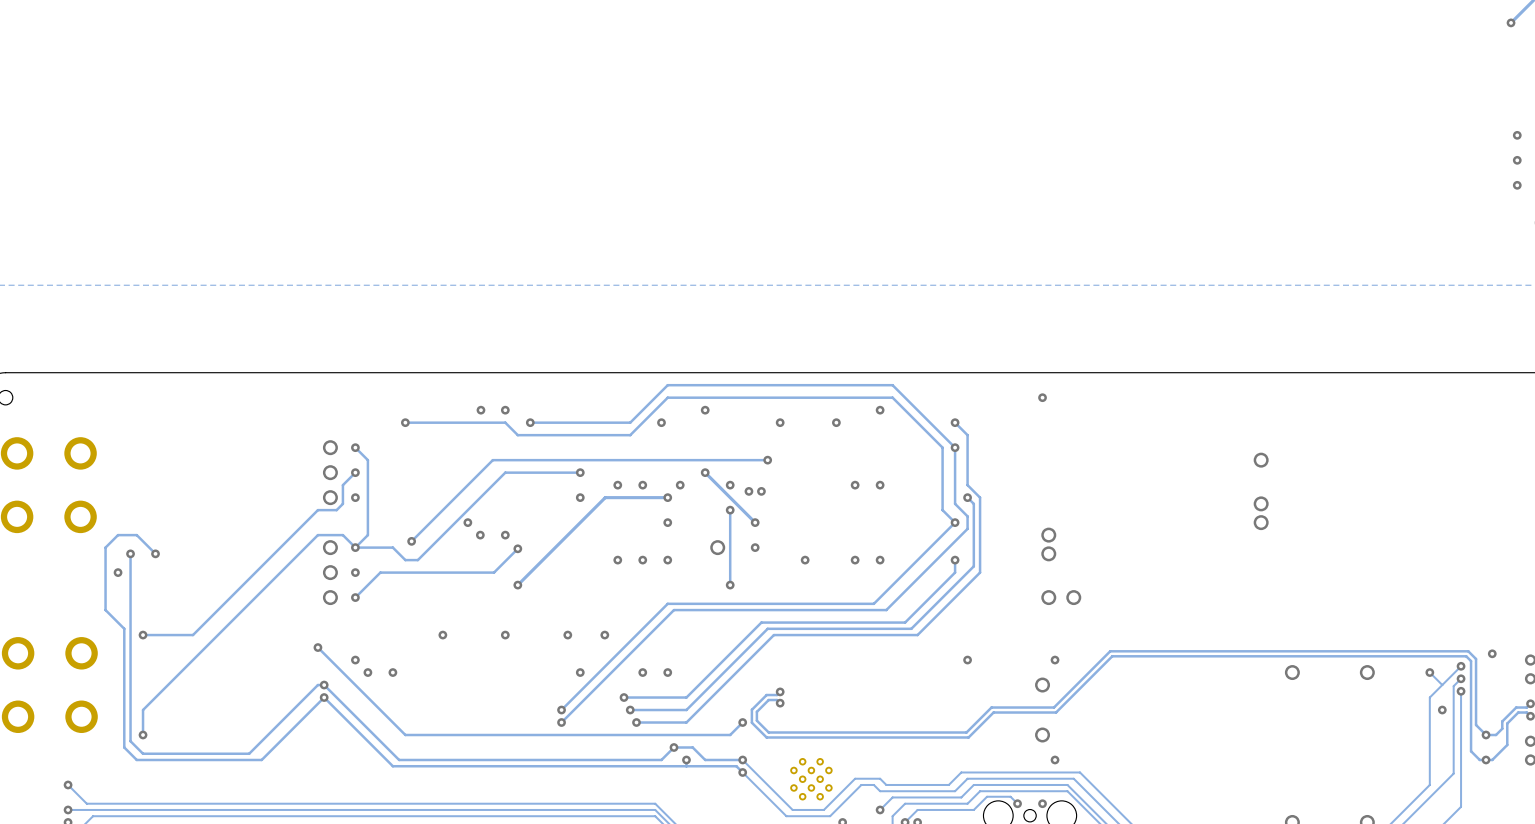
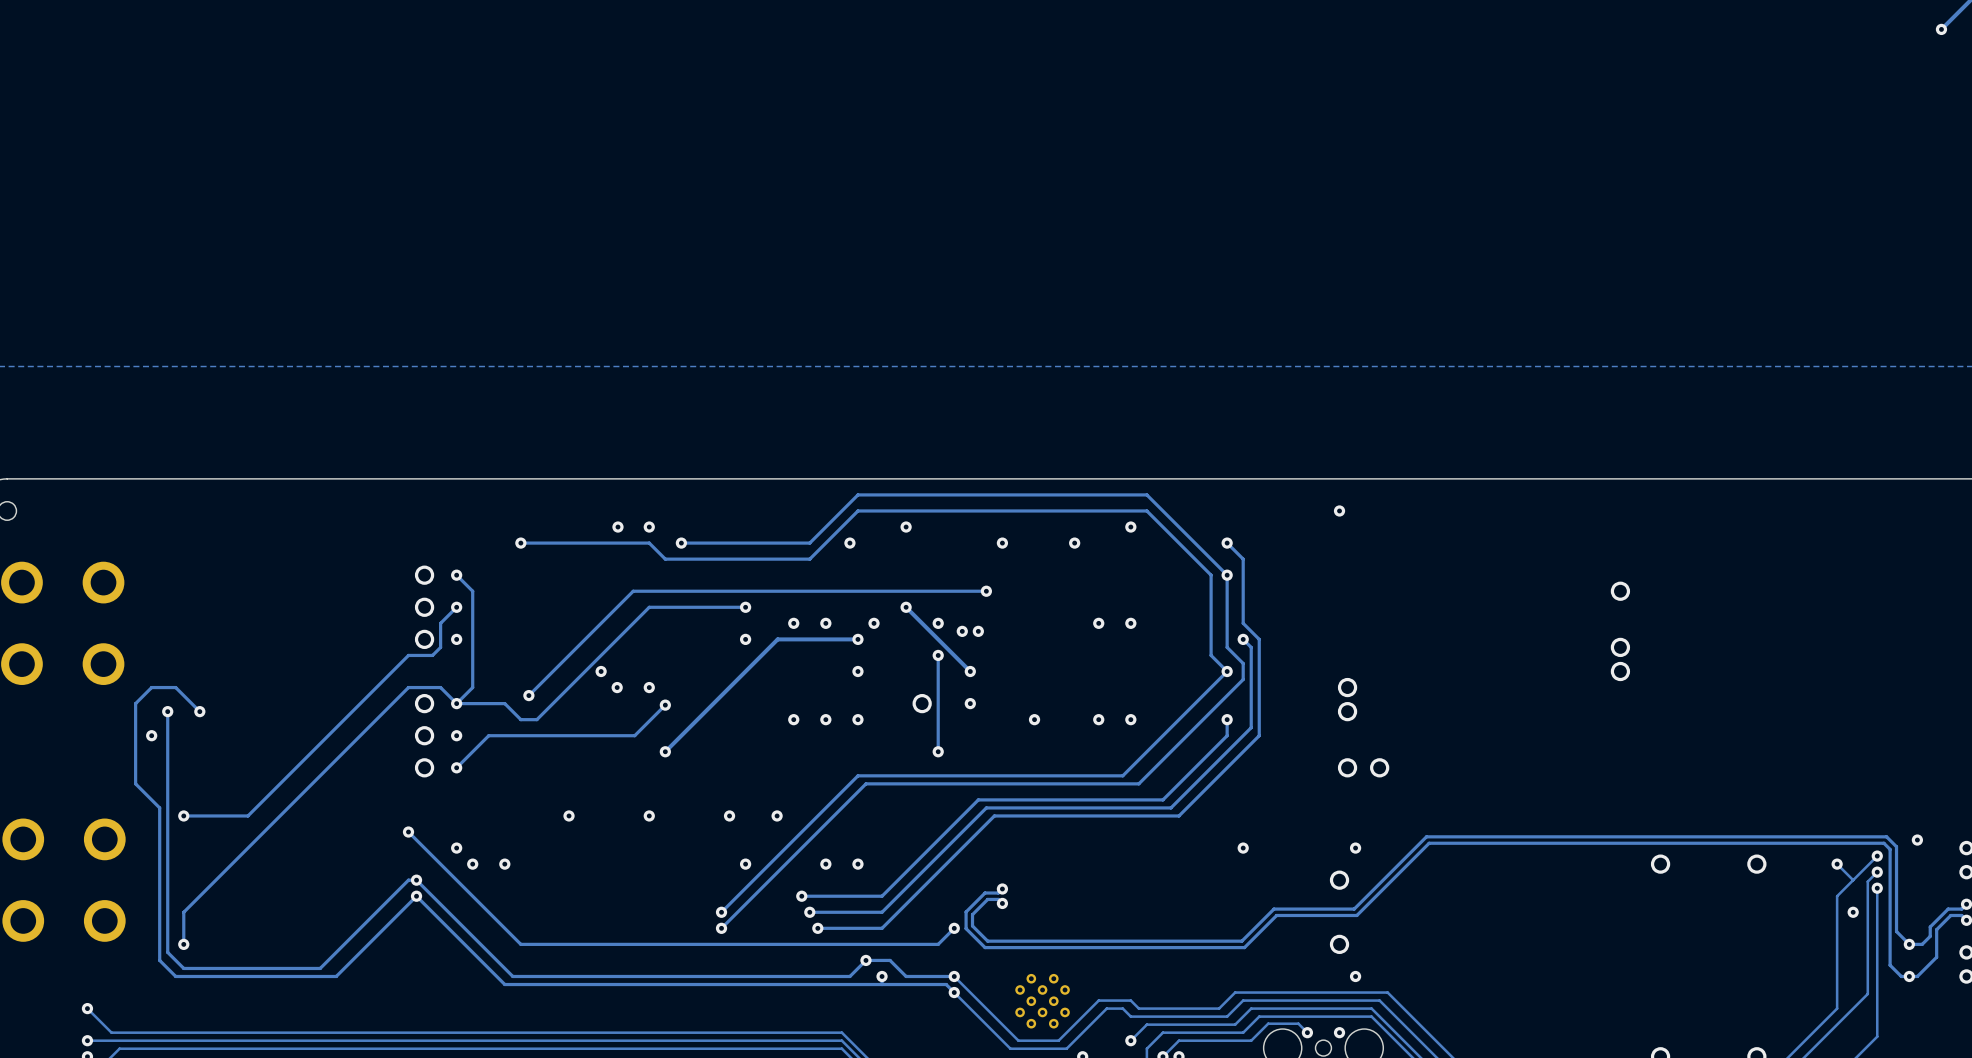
via: (1517, 135) -> none
via: (1517, 160) -> none
via: (1517, 185) -> none

